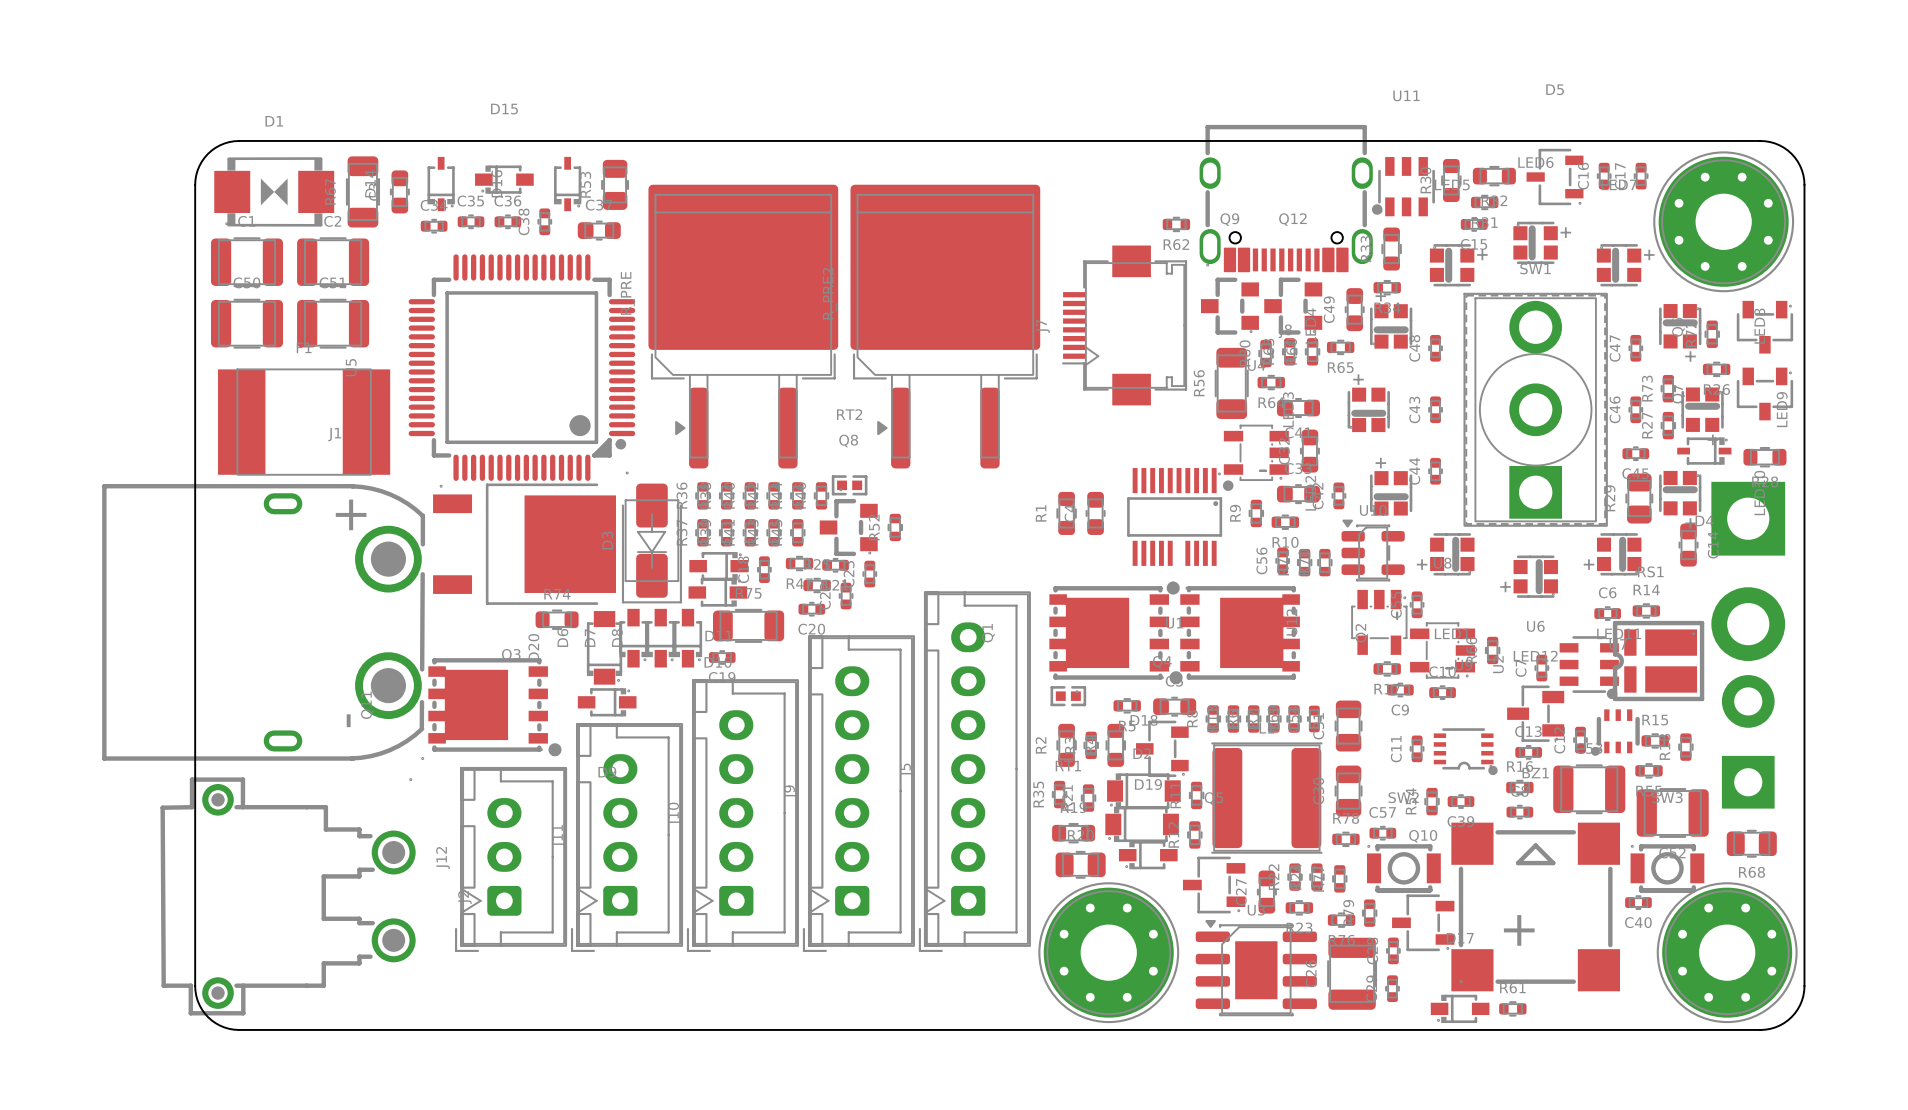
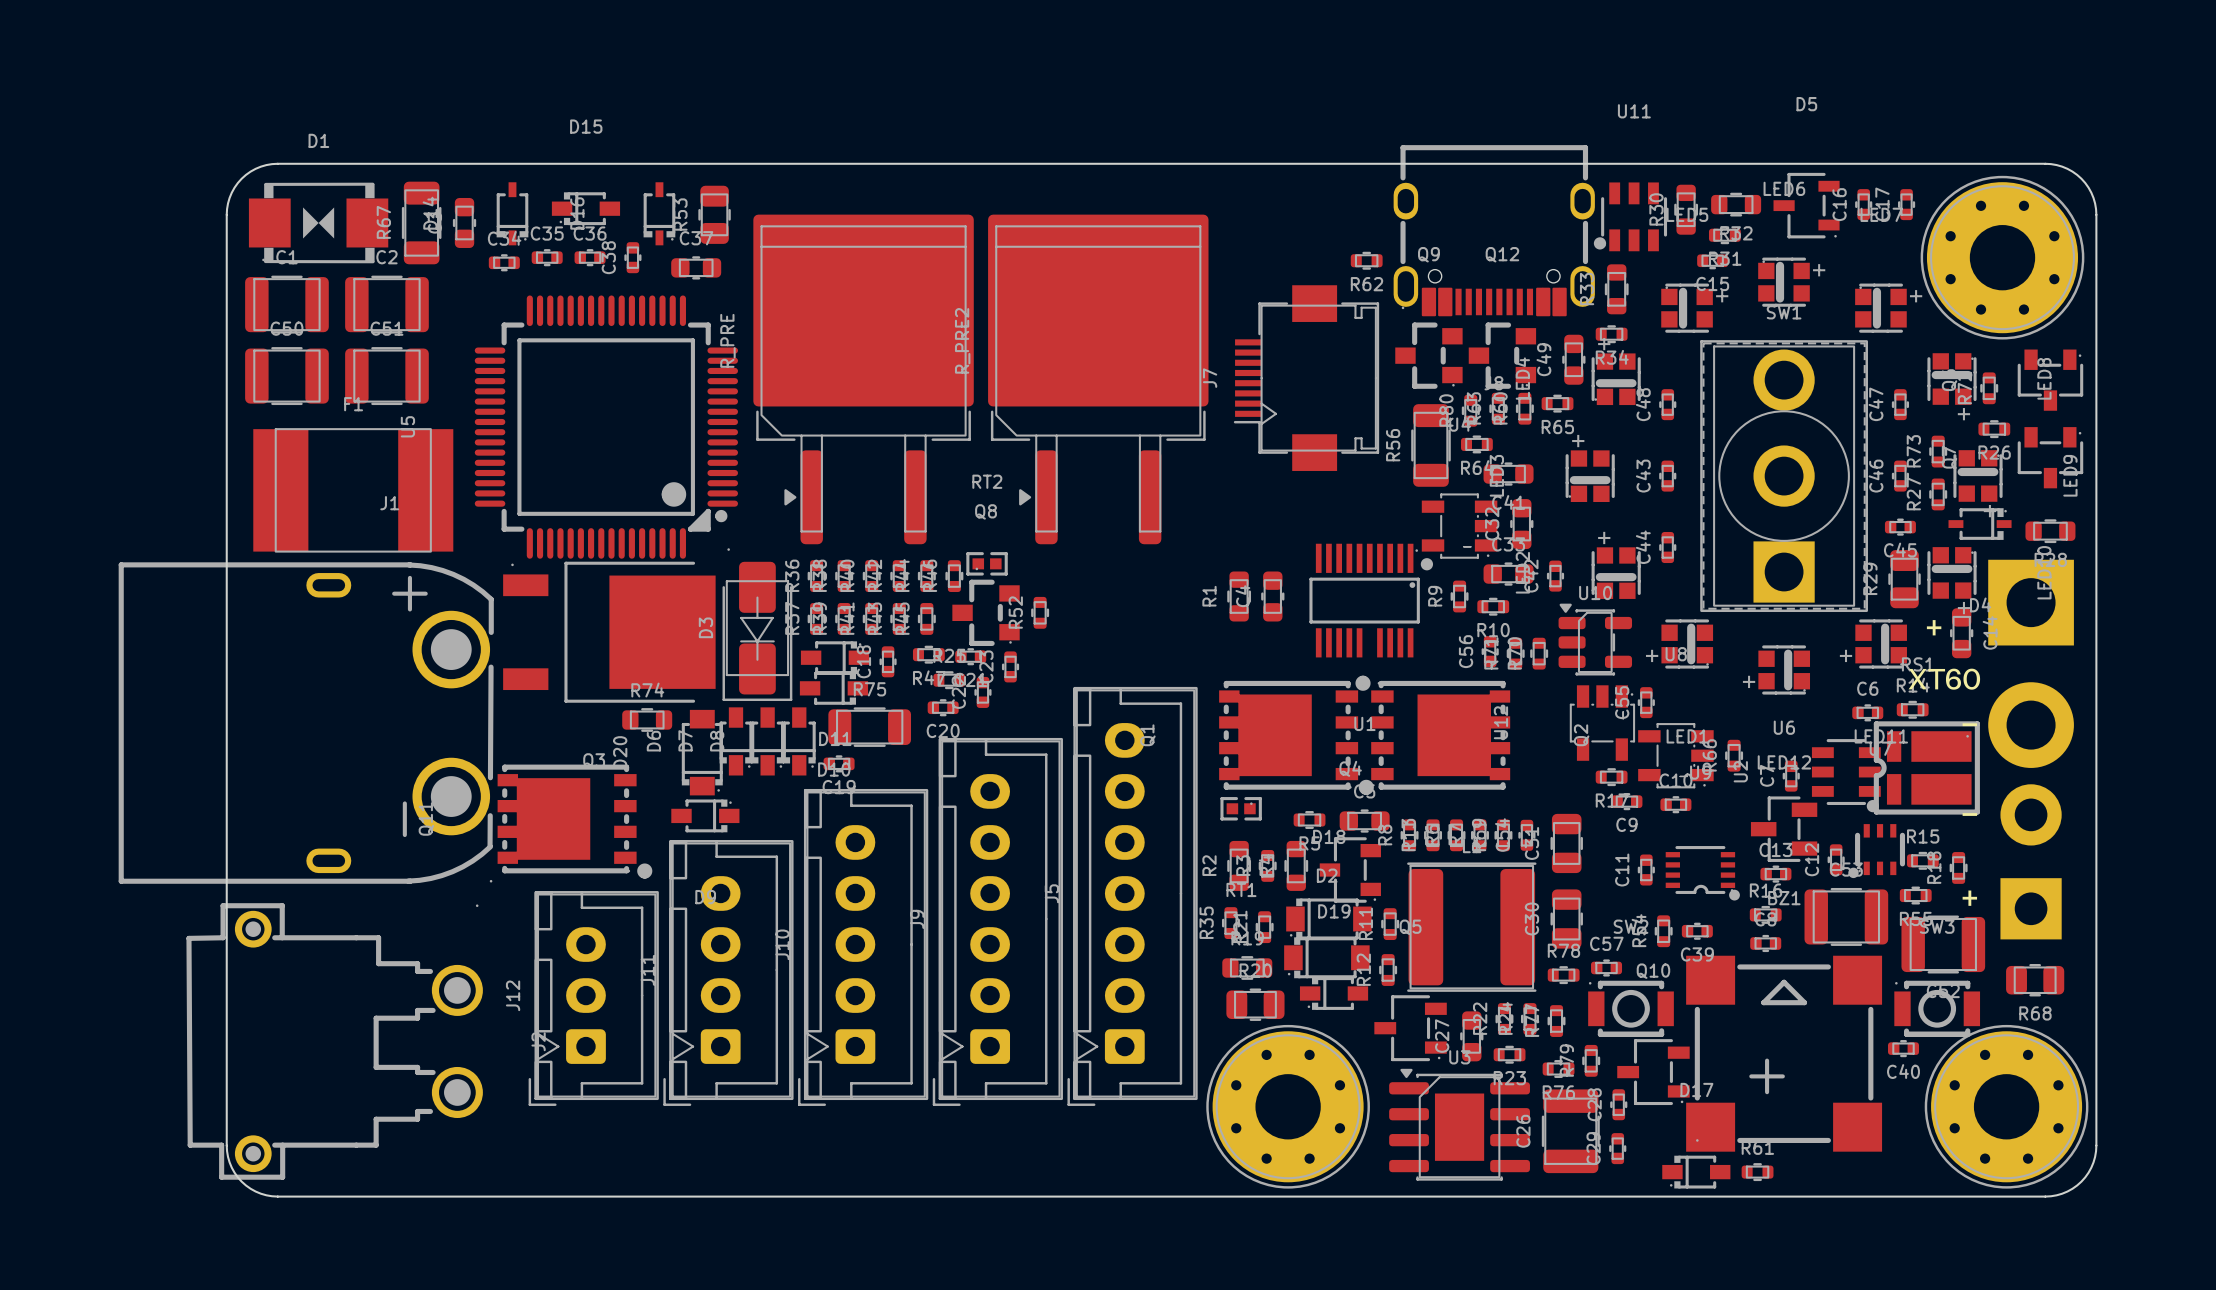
drawing: none -> [1926, 620, 1942, 636]
drawing: none -> [1908, 668, 1981, 690]
drawing: none -> [1962, 723, 1978, 727]
drawing: none -> [1962, 813, 1978, 816]
drawing: none -> [1962, 890, 1978, 906]

